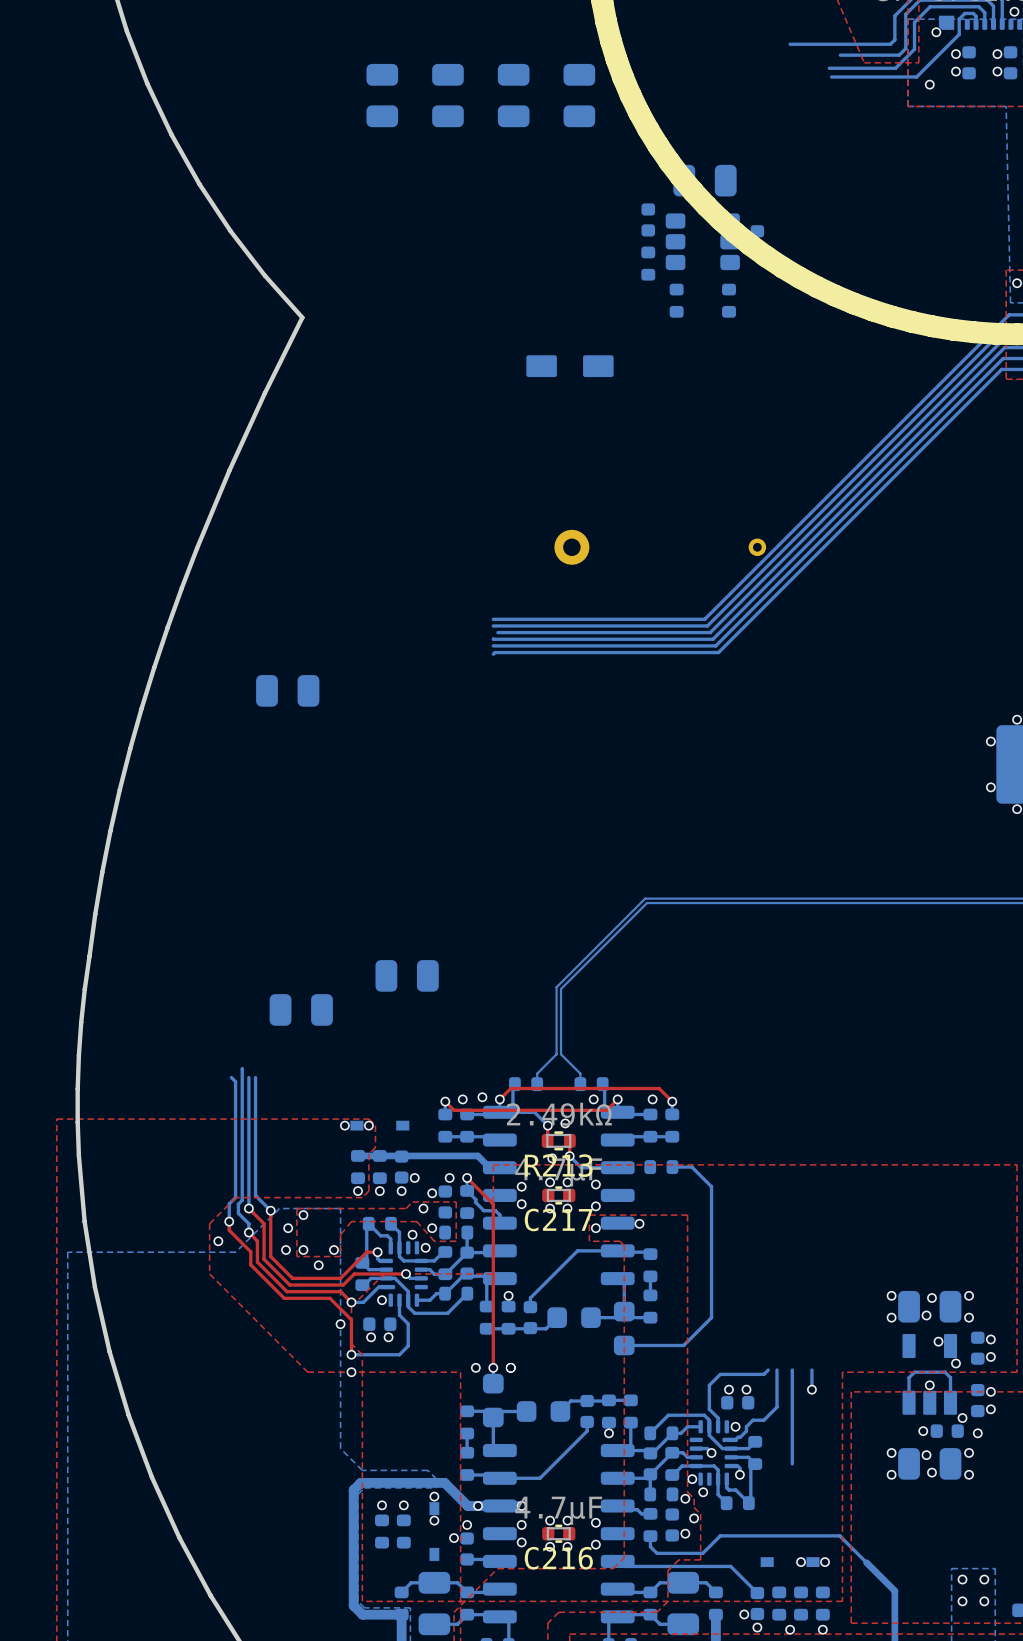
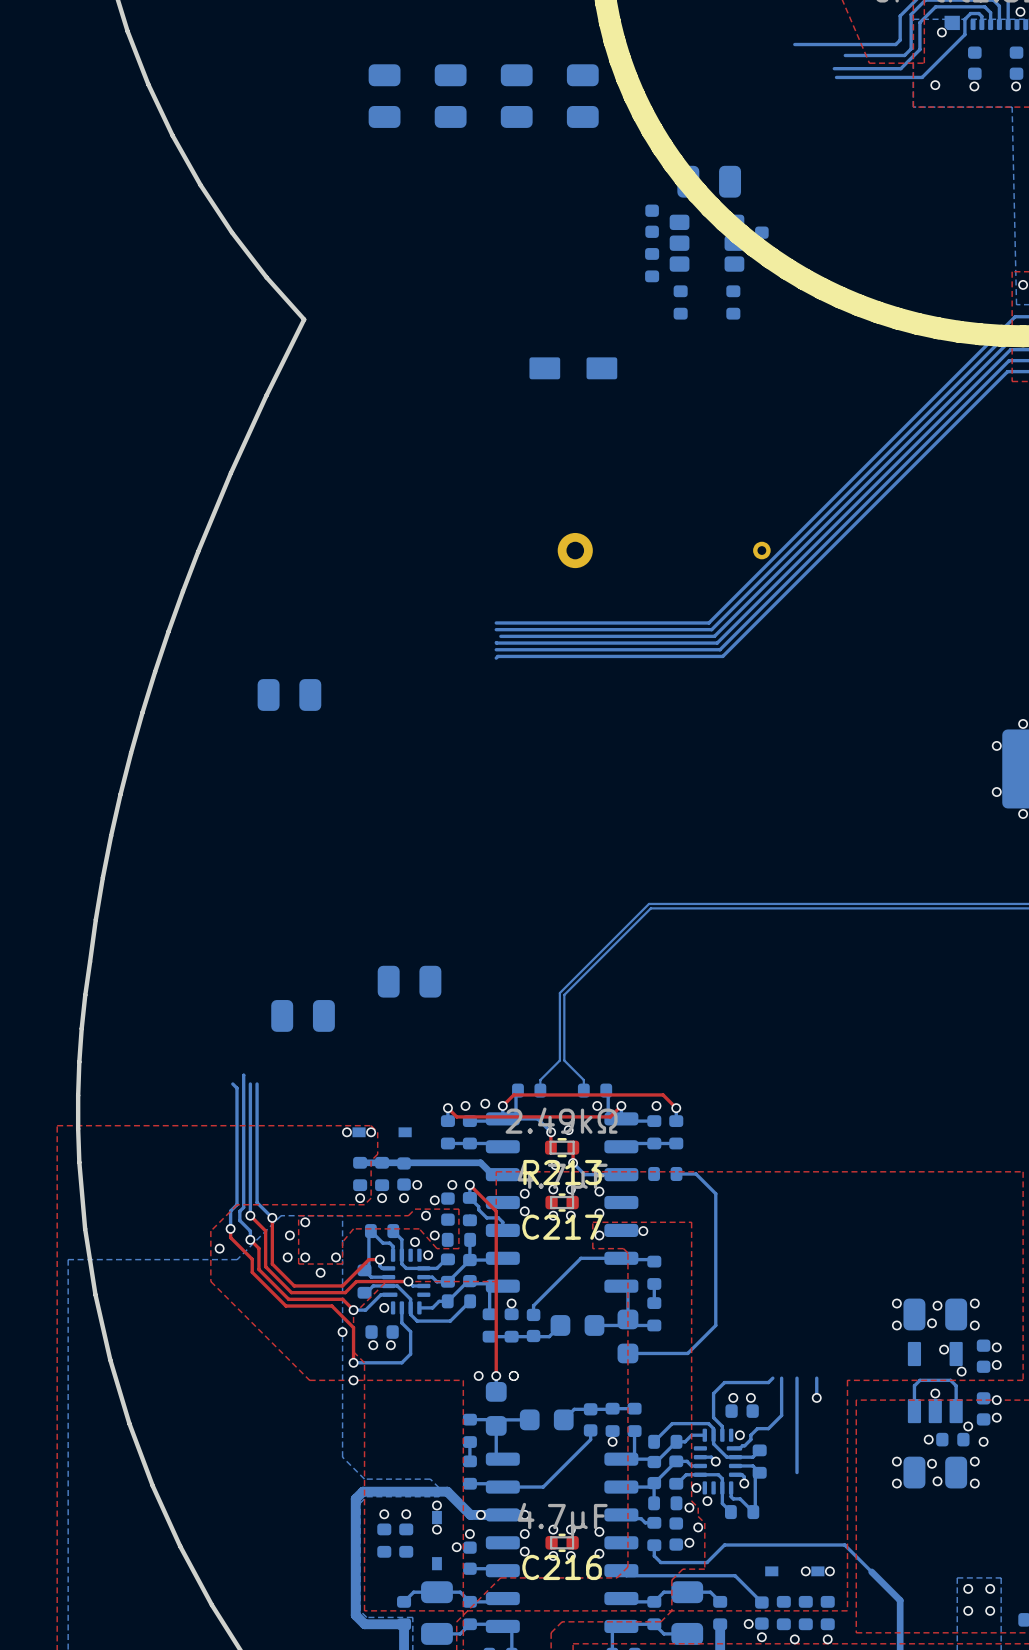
via: (955, 54) -> none
via: (997, 54) -> none
via: (955, 71) -> none
via: (997, 71) -> none
via: none -> (974, 86)
via: none -> (1016, 86)

